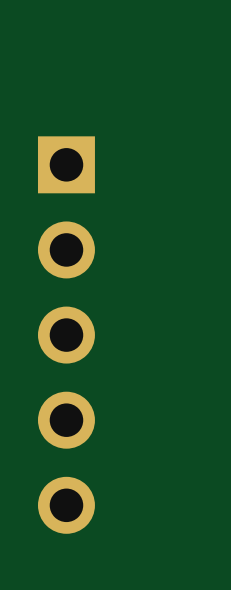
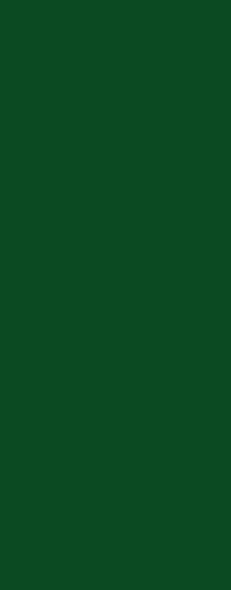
part: (66, 335) -> none

